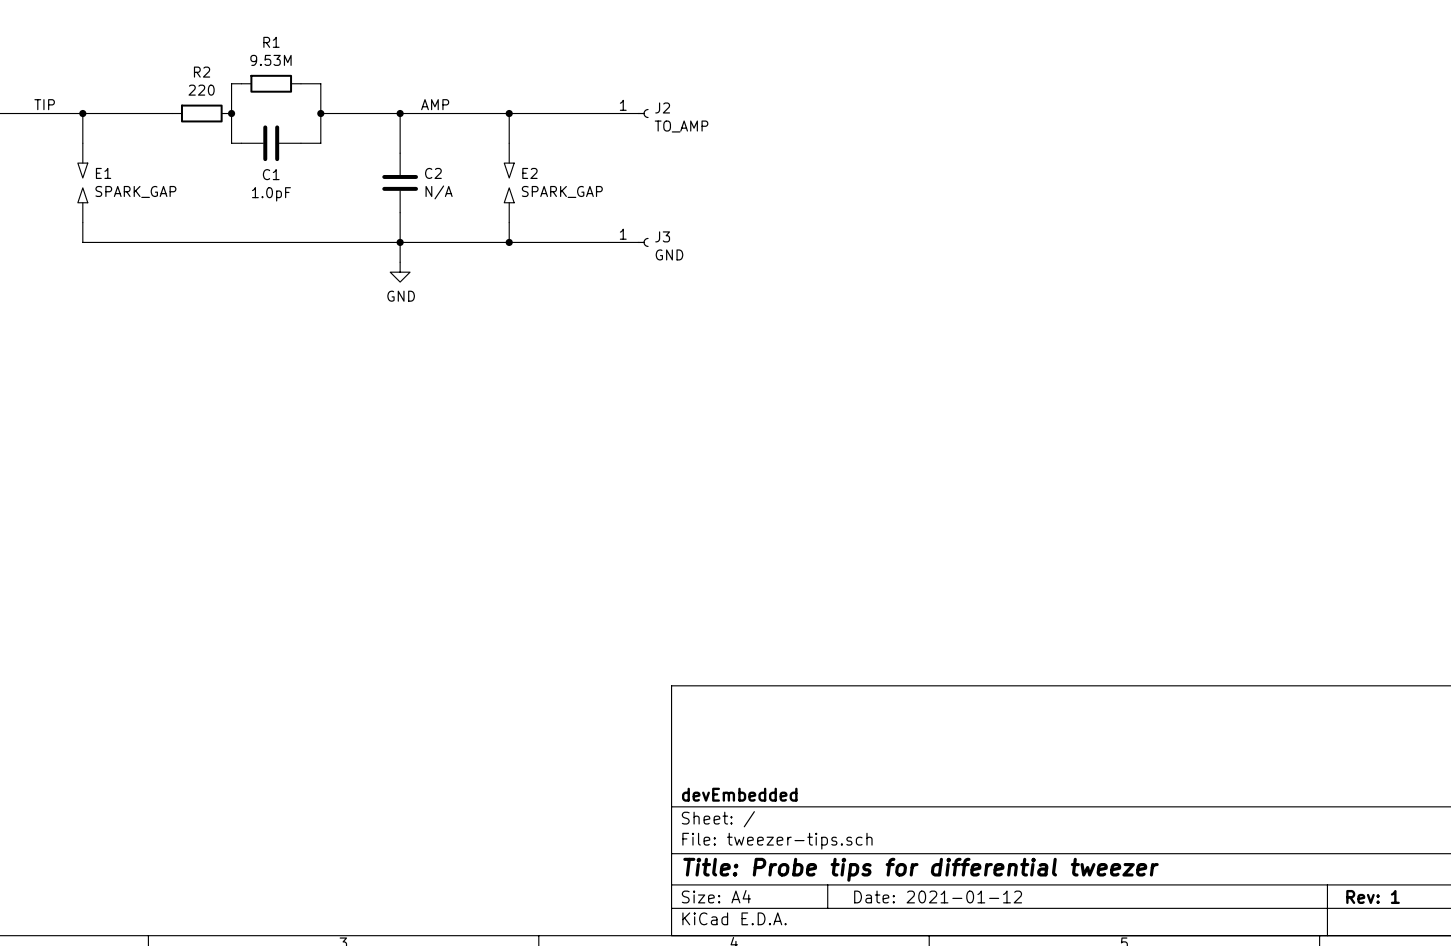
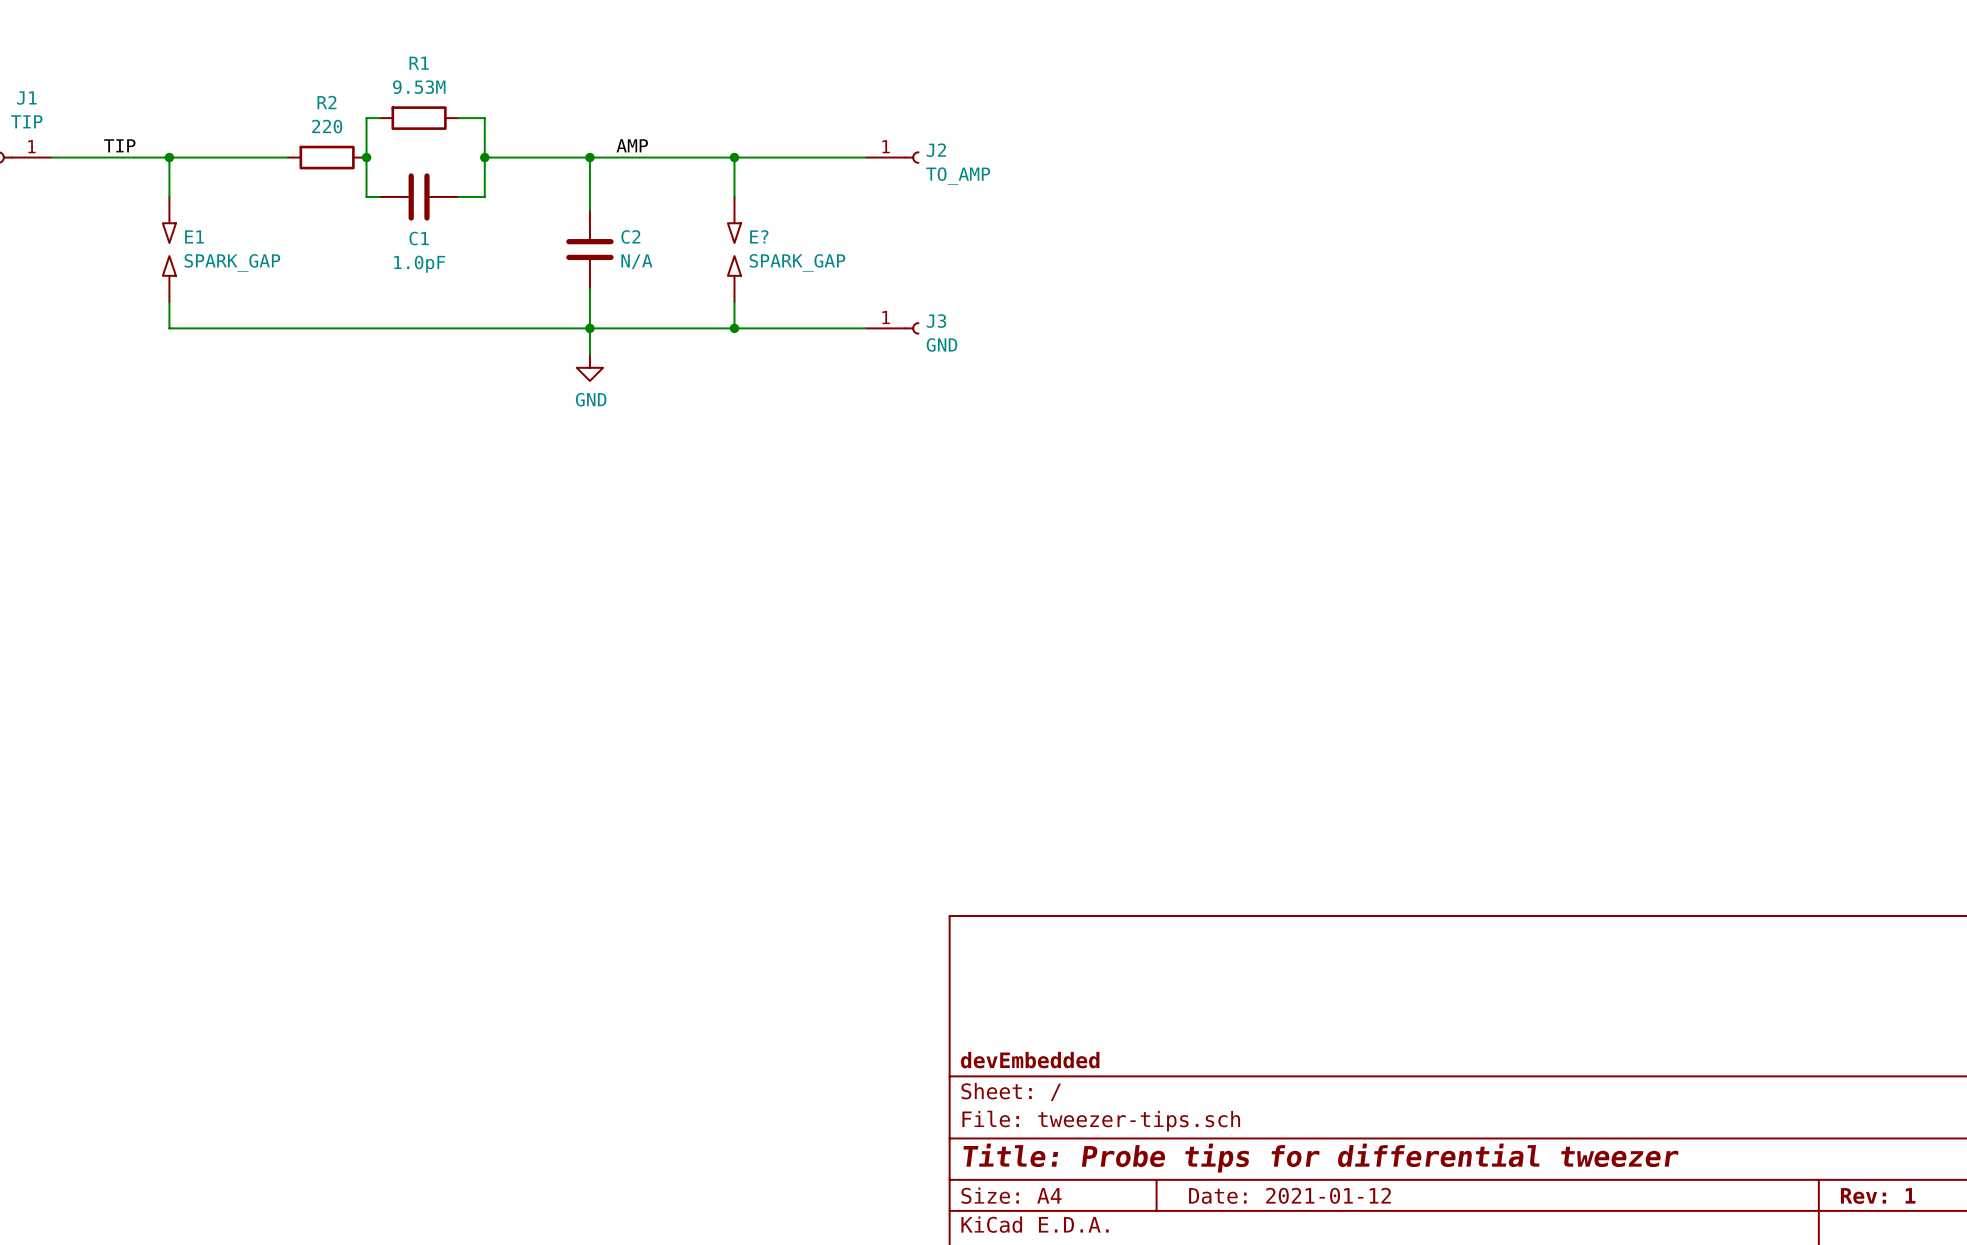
E2 name: E2 (529, 173) -> E? (759, 236)

